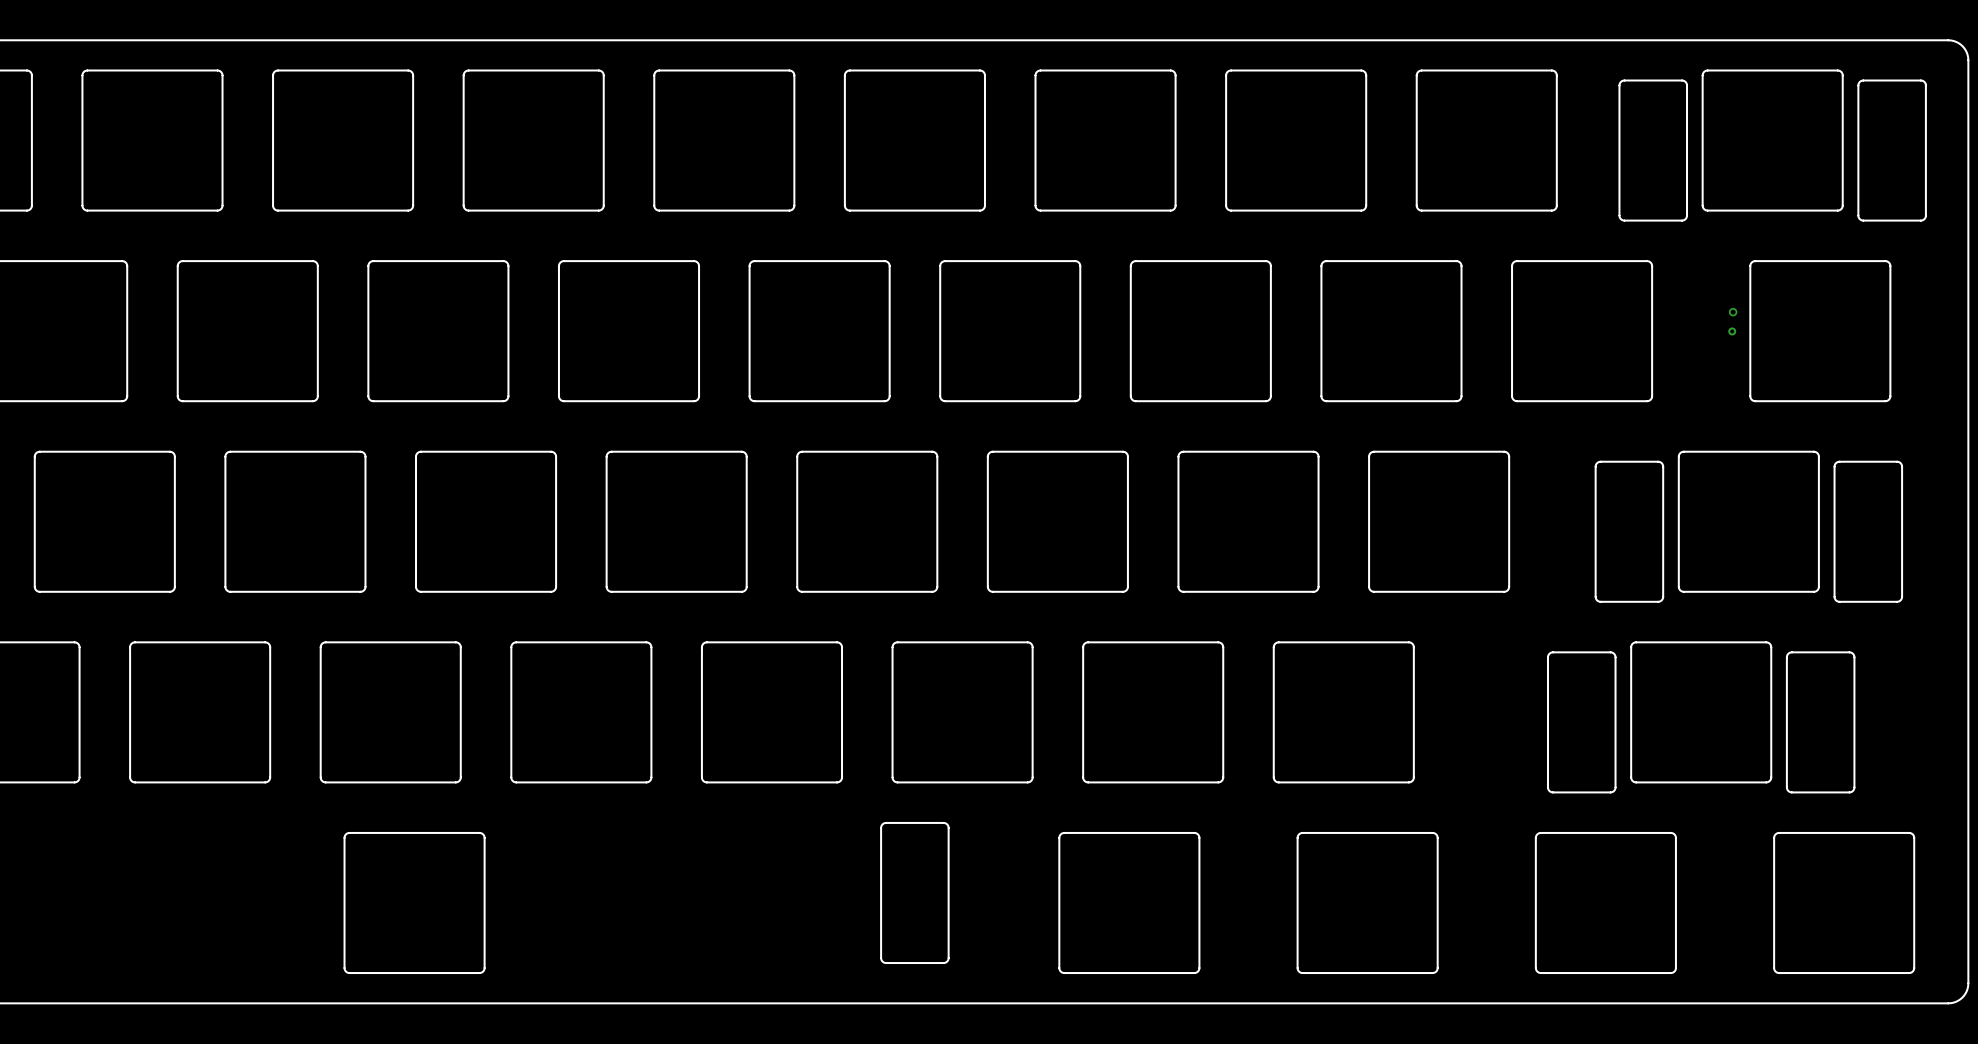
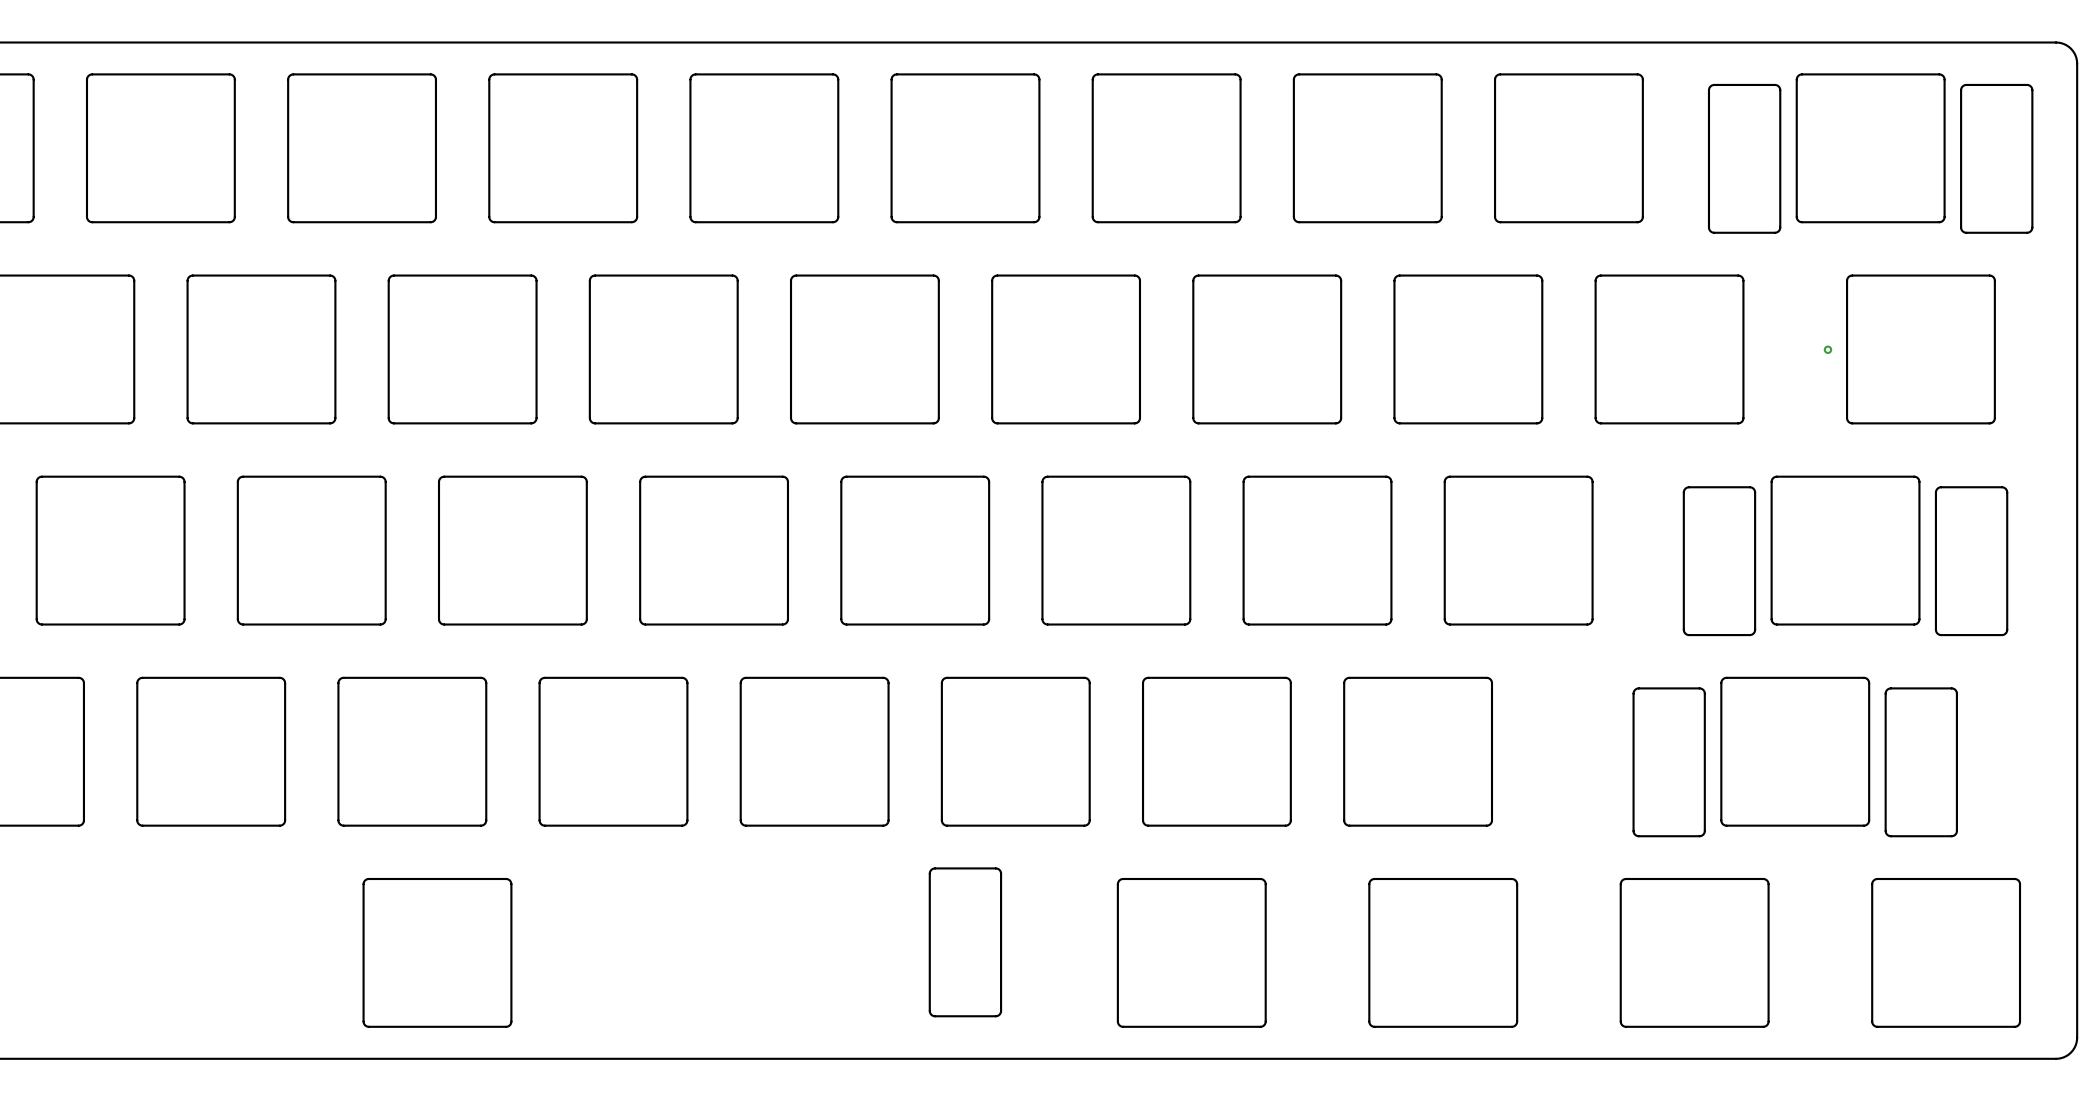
part: (1733, 312) -> none

